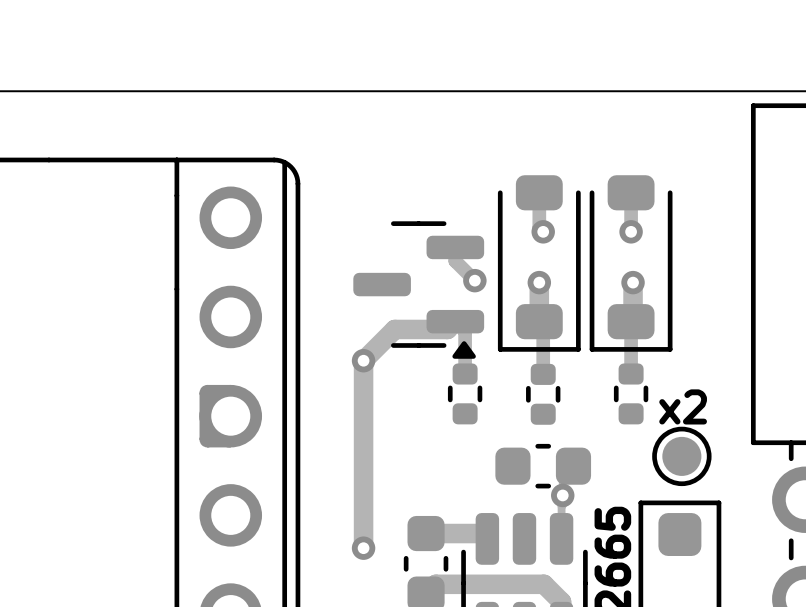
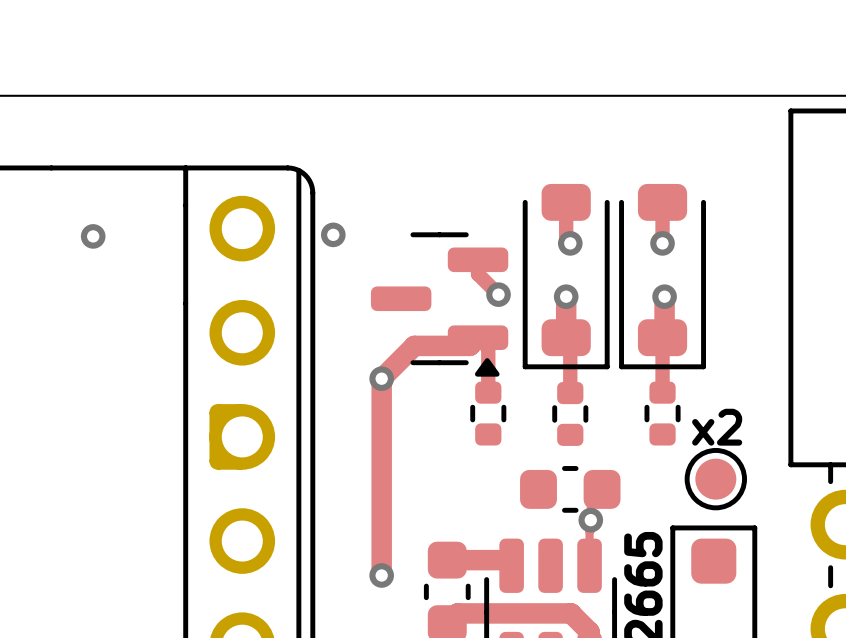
via: none -> (333, 234)
via: none -> (93, 236)

